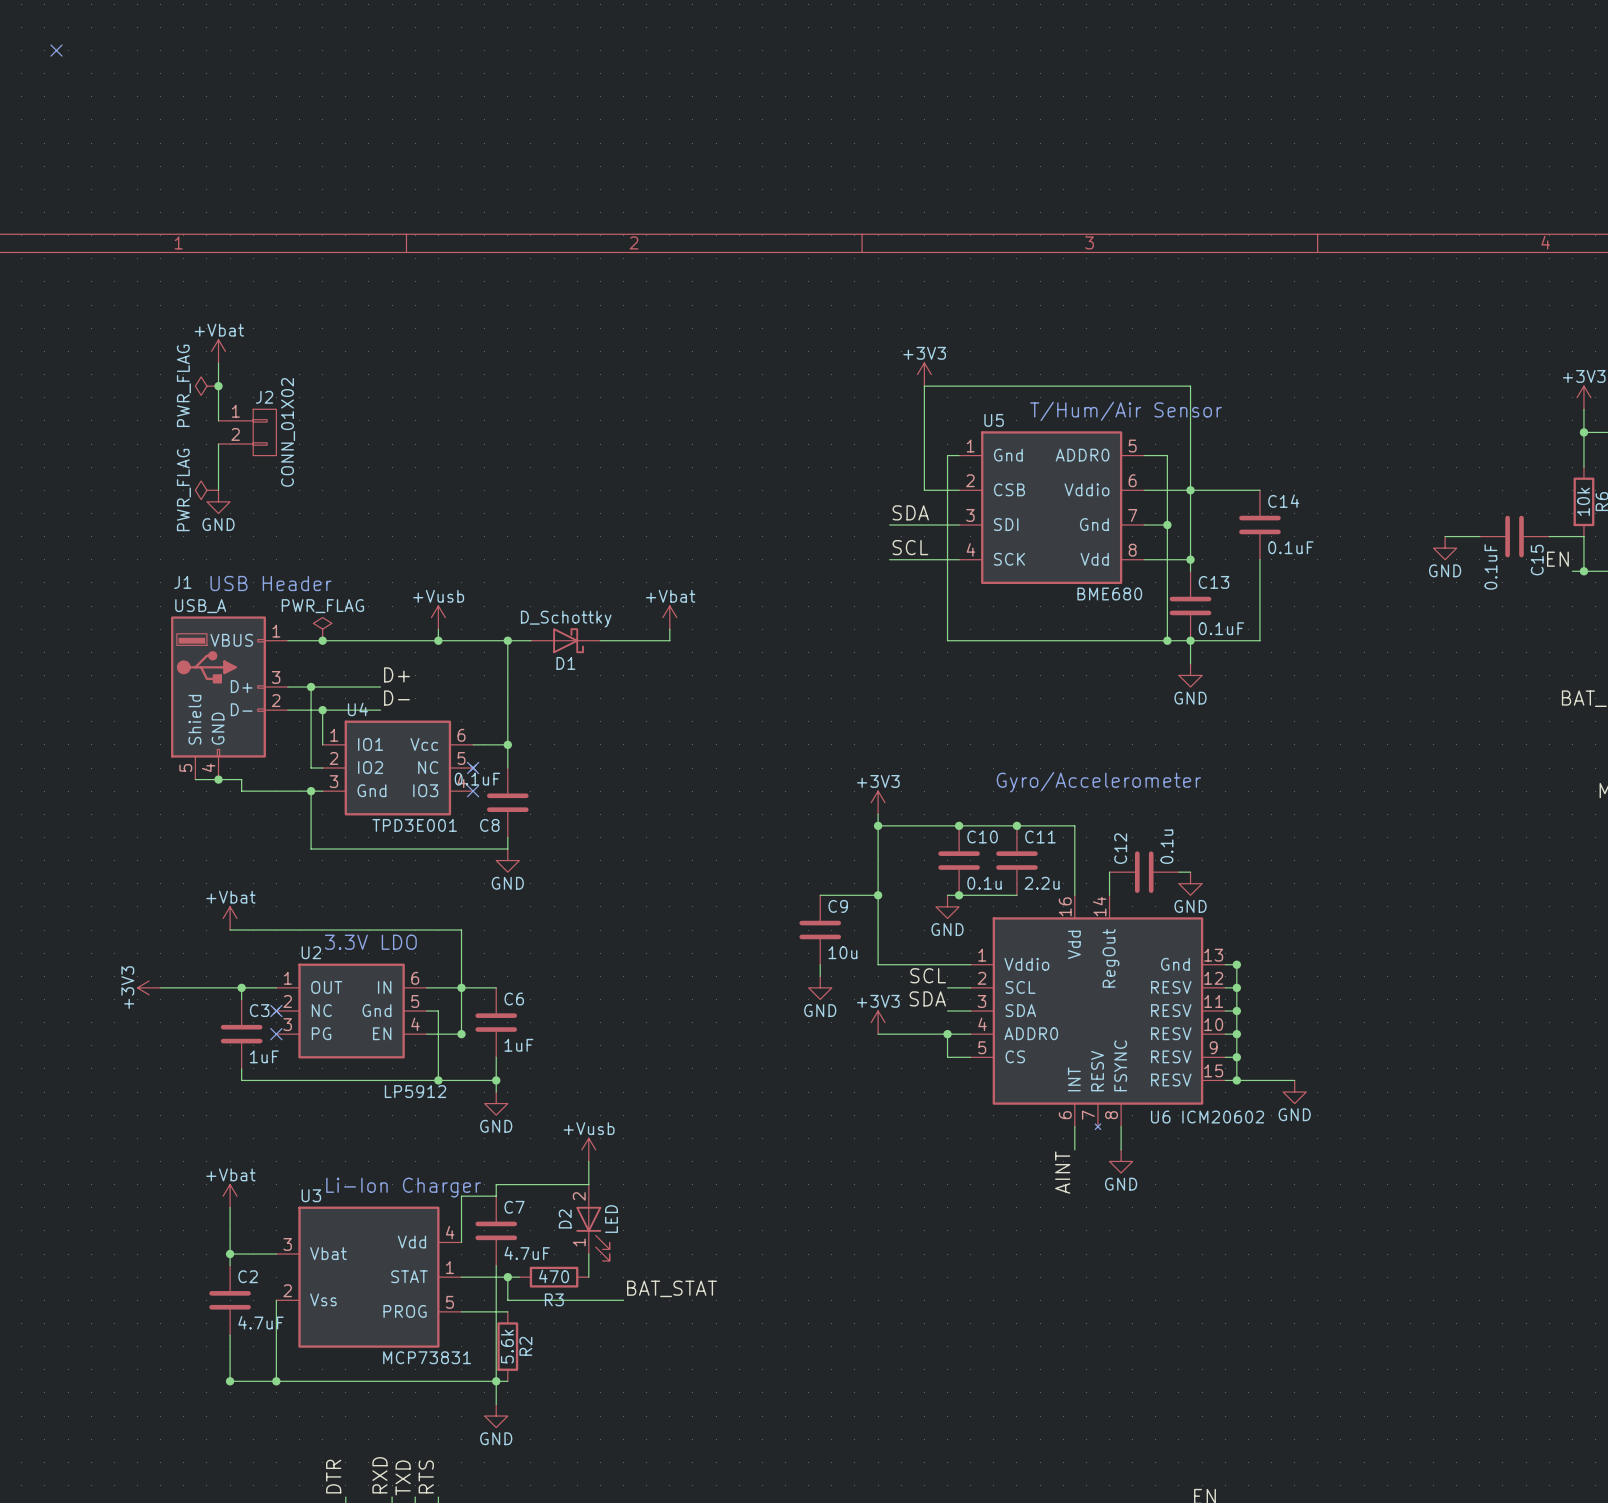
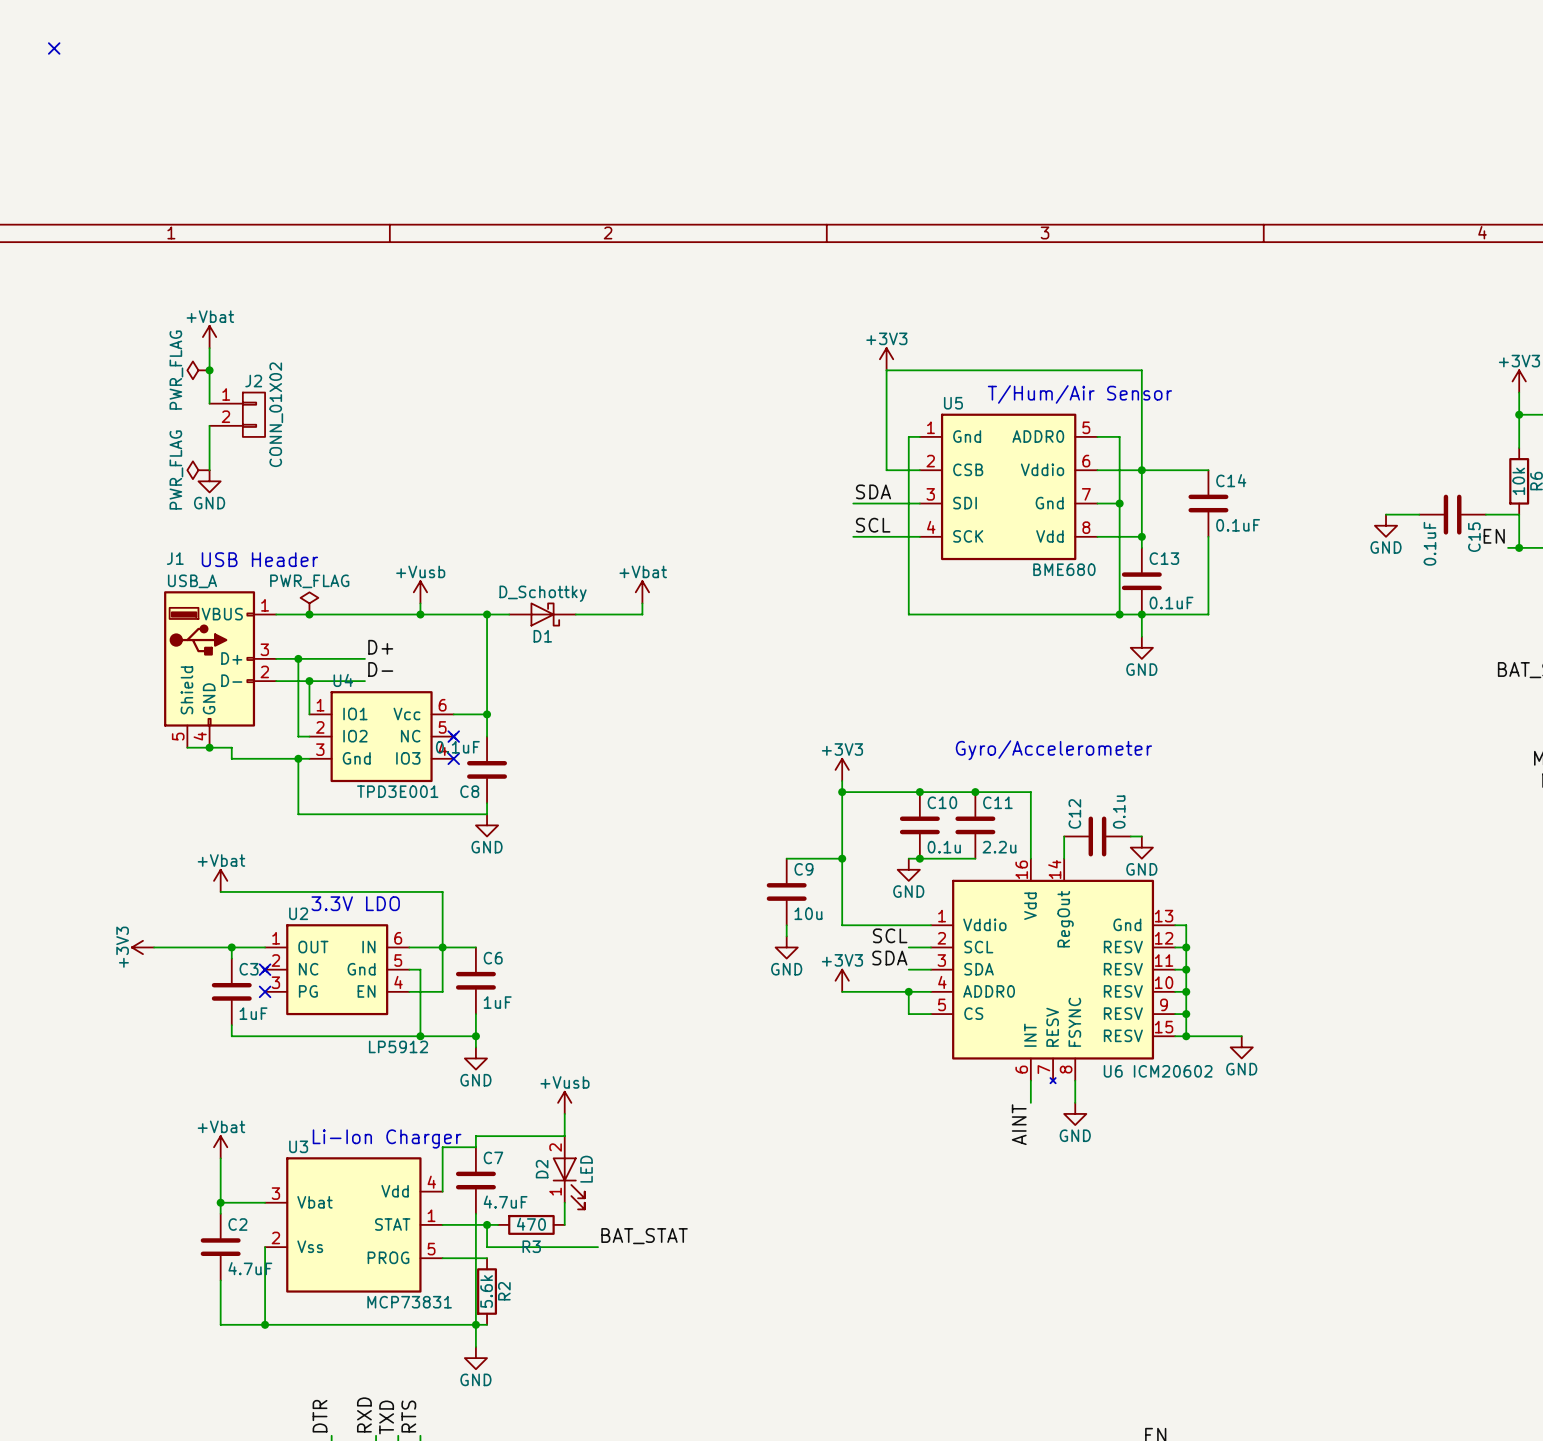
junction: (1236, 964) -> none
junction: (461, 1034) -> none
junction: (230, 1381) -> none

